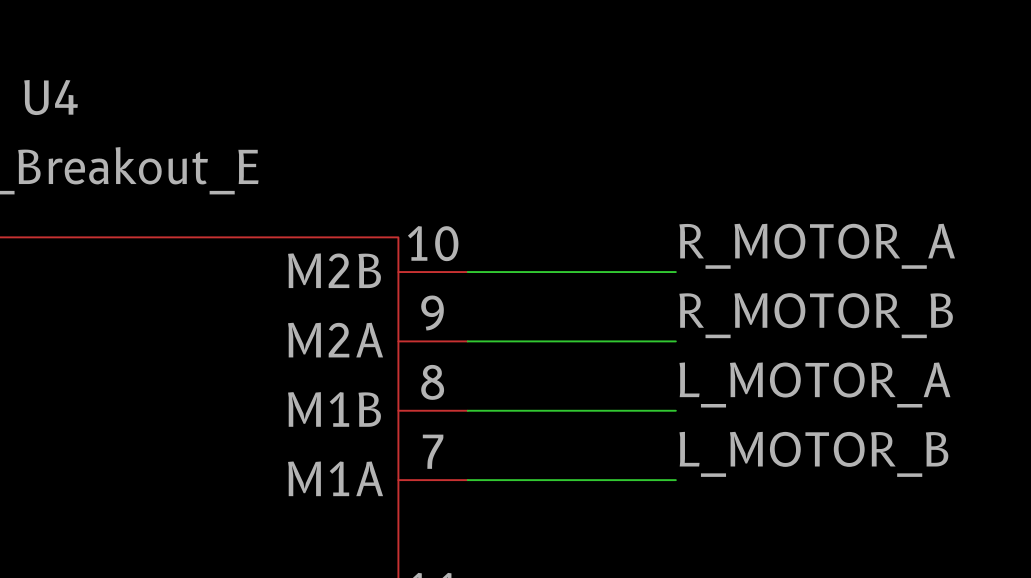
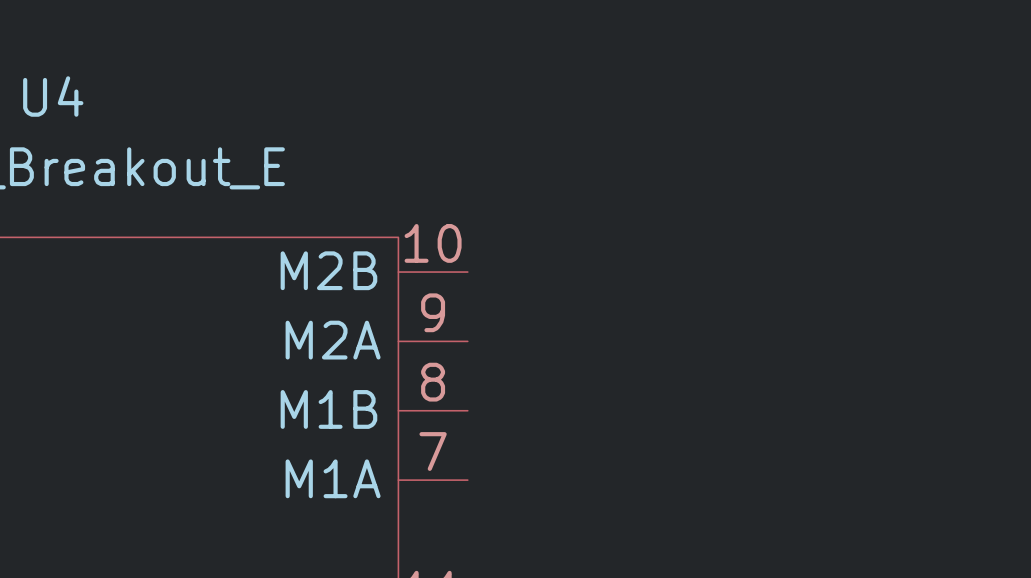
label: R_MOTOR_A (817, 246) -> none
wire: (467, 272) (675, 272) -> none
label: R_MOTOR_B (816, 315) -> none
wire: (467, 341) (675, 341) -> none
label: L_MOTOR_A (814, 385) -> none
wire: (467, 410) (675, 410) -> none
label: L_MOTOR_B (813, 454) -> none
wire: (467, 480) (675, 480) -> none

